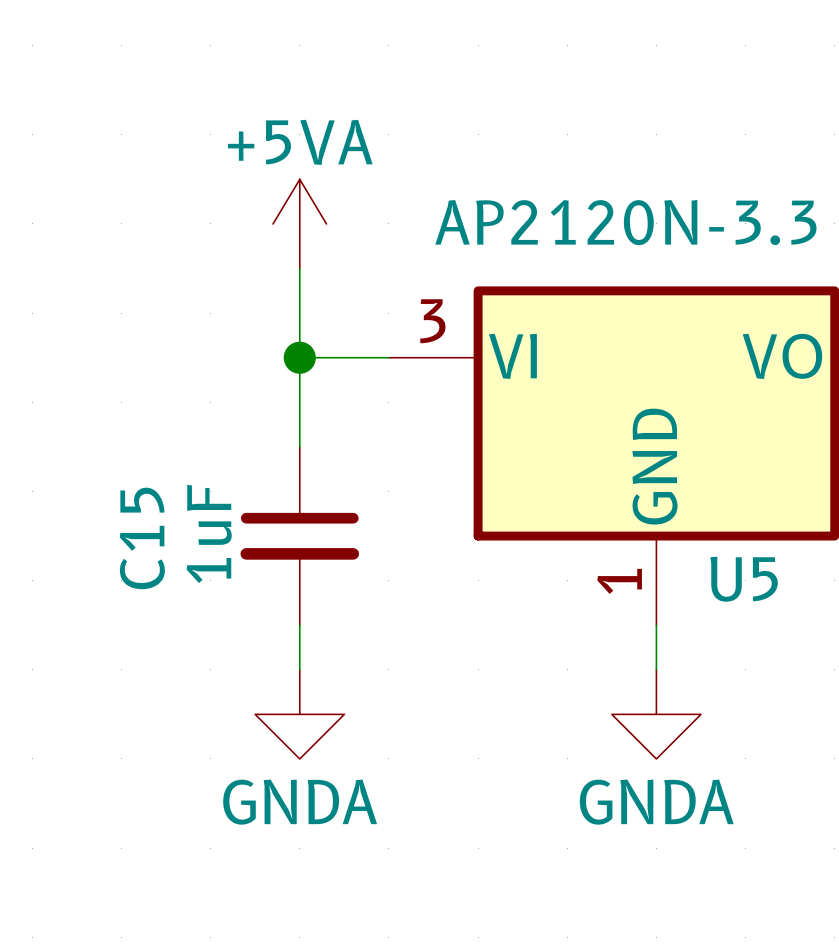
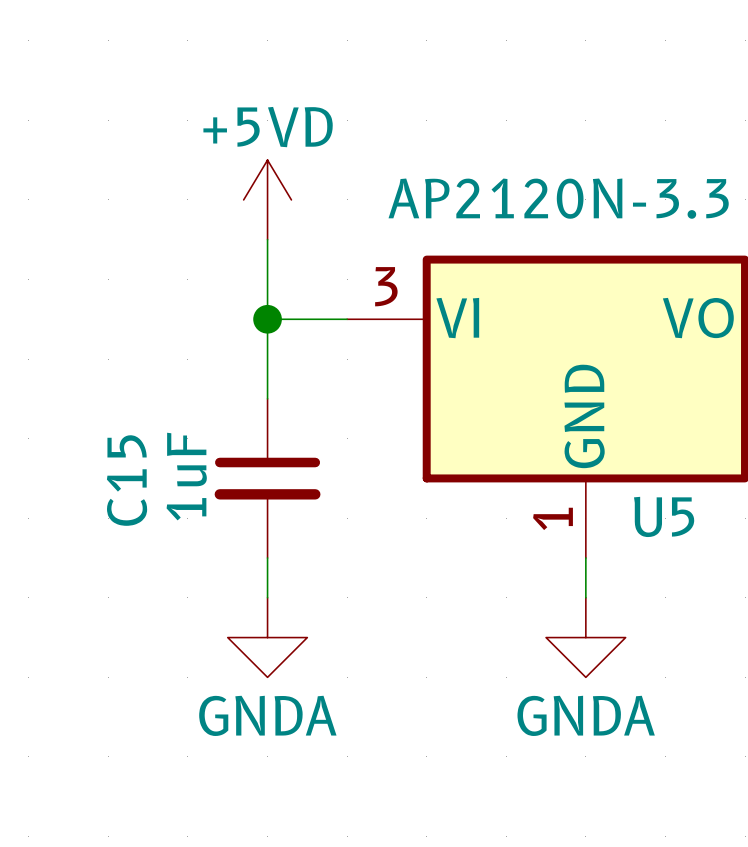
power symbol: +5VA (299, 223) -> +5VD (267, 199)

